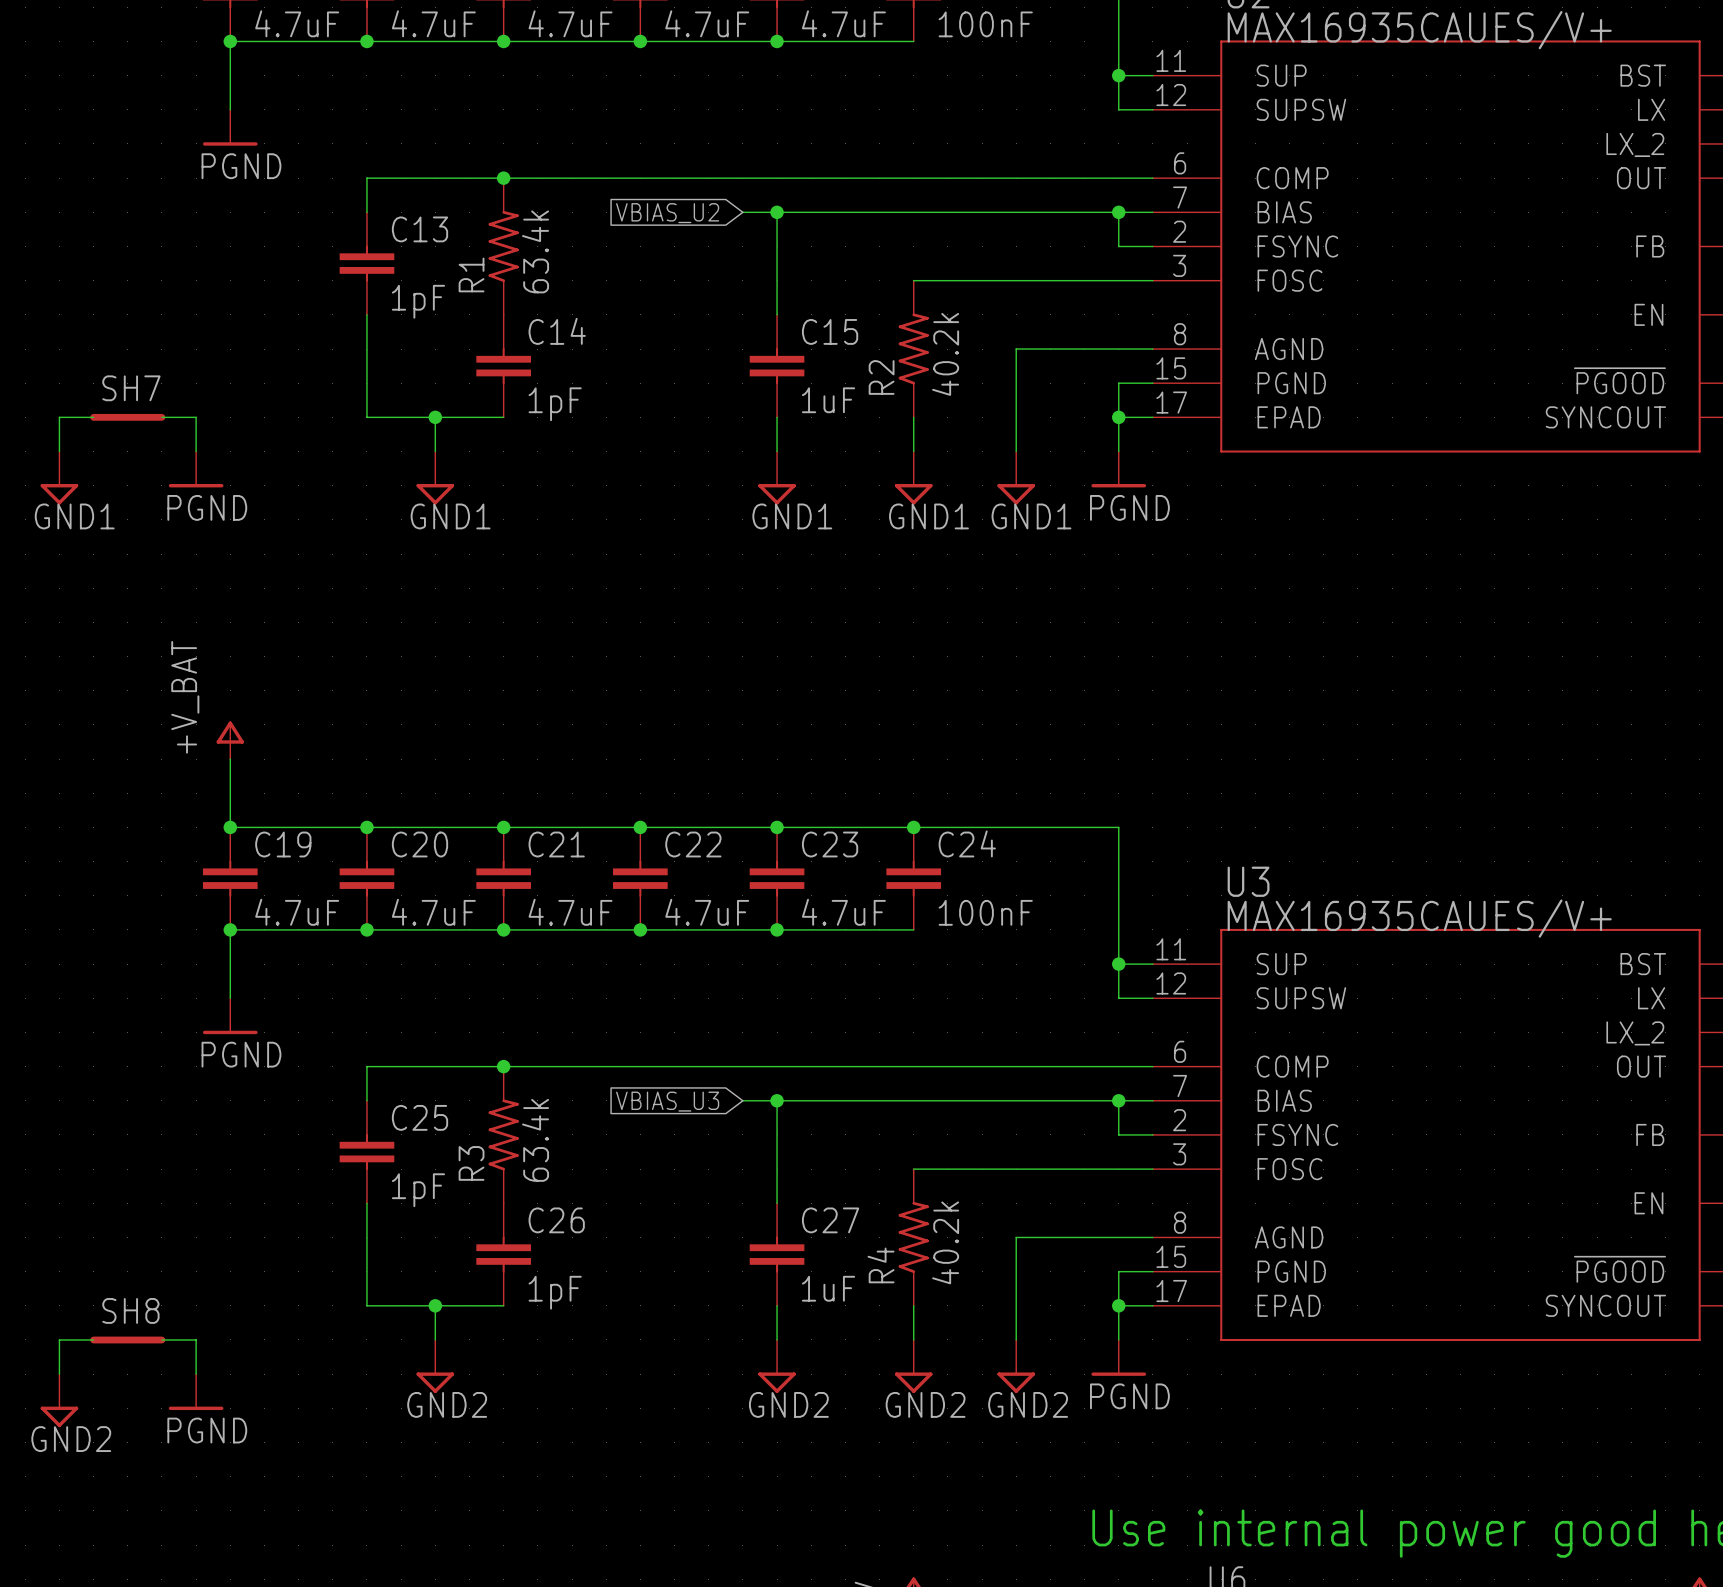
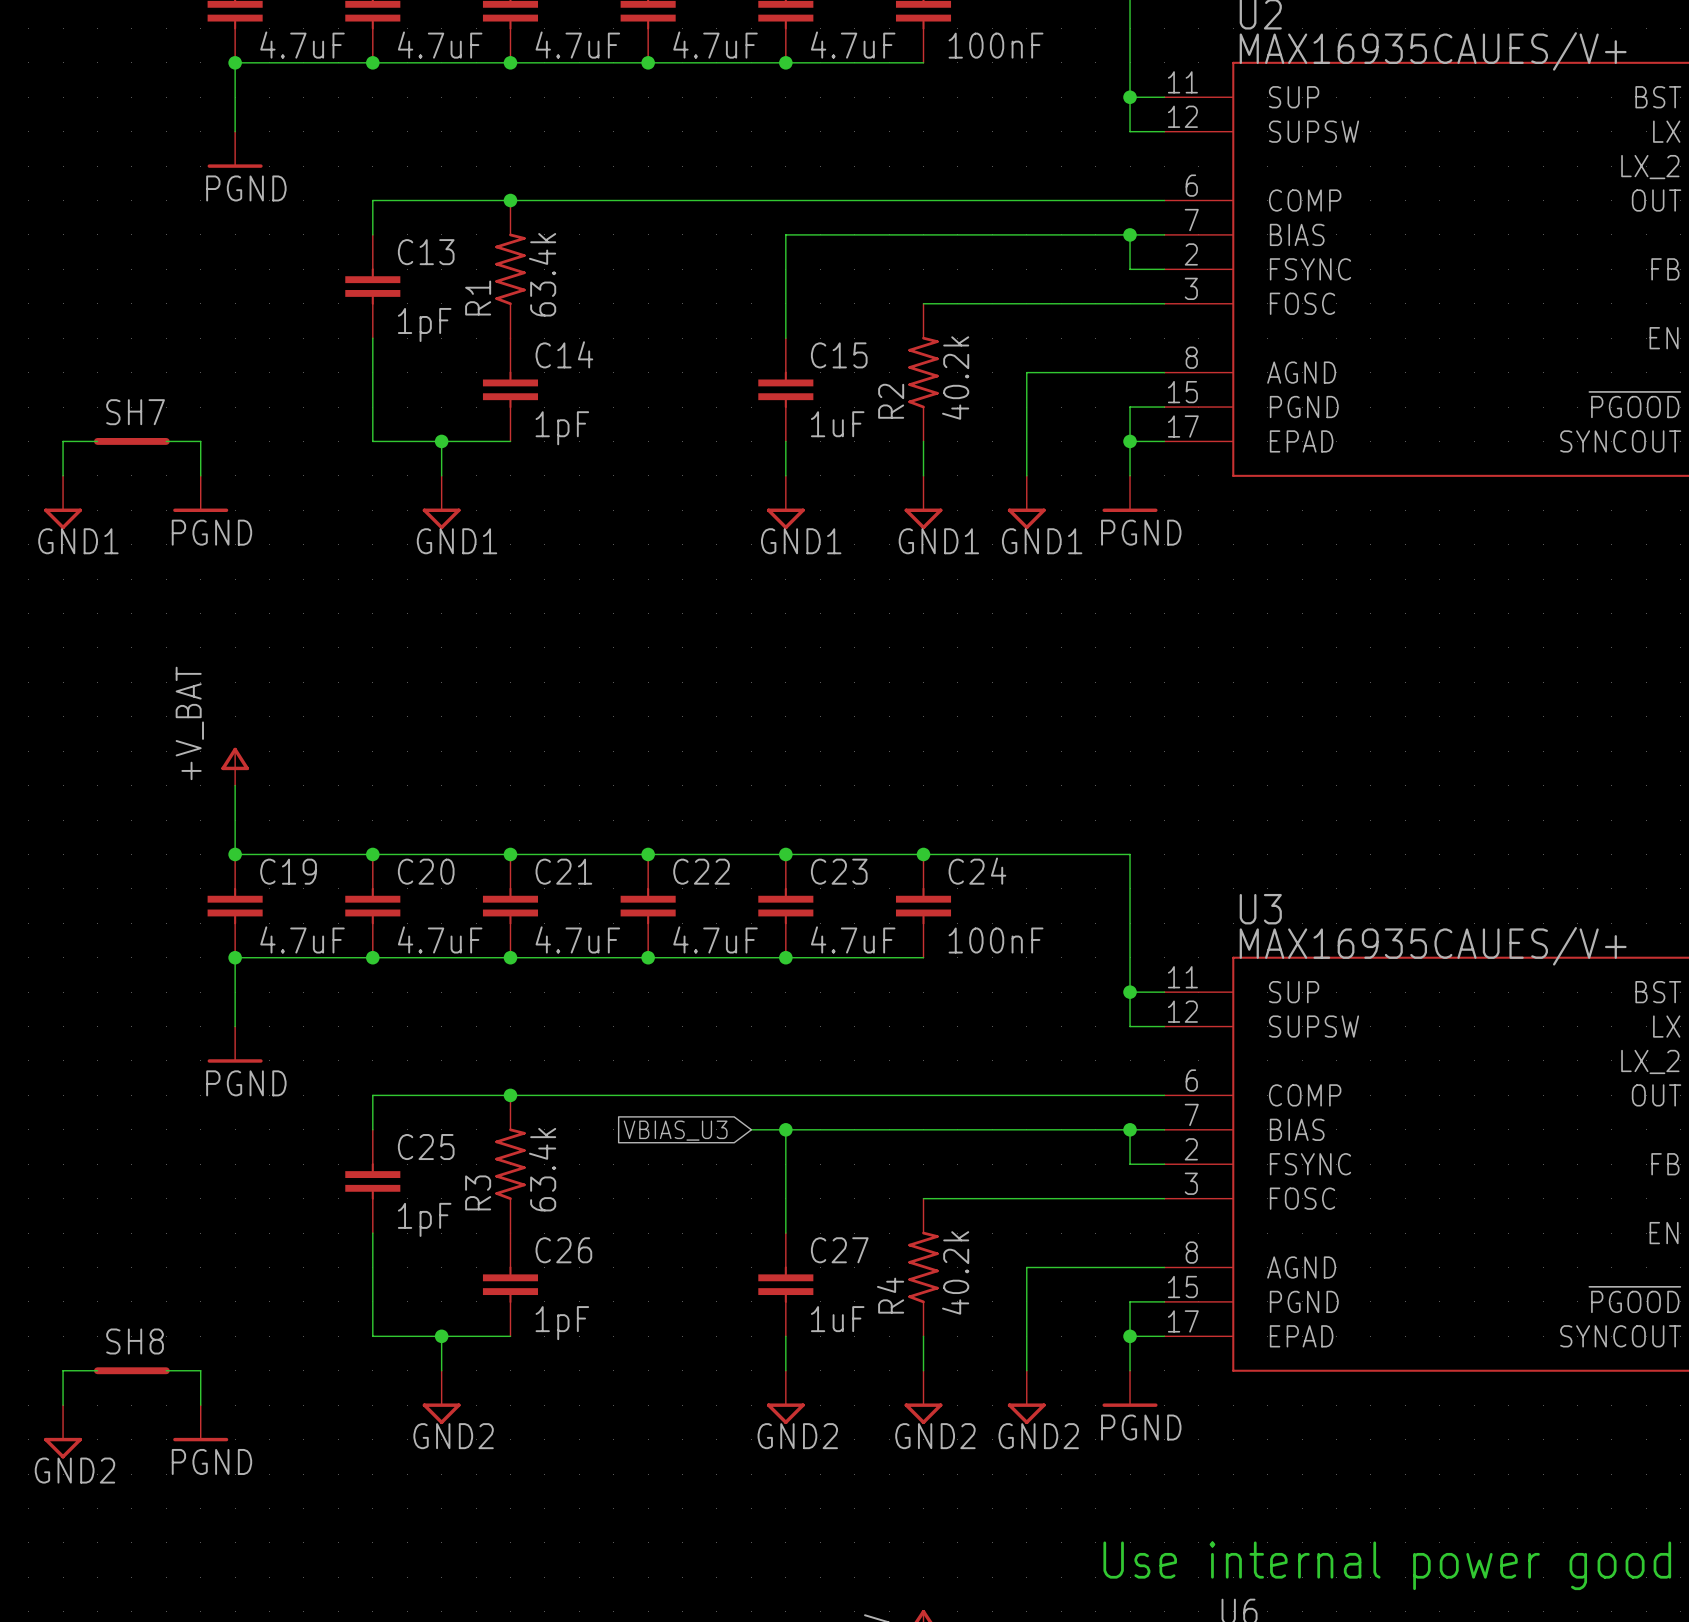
wire: (742, 212) (777, 212) -> none
junction: (777, 212) -> none
global label: VBIAS_U2 (667, 213) -> none

